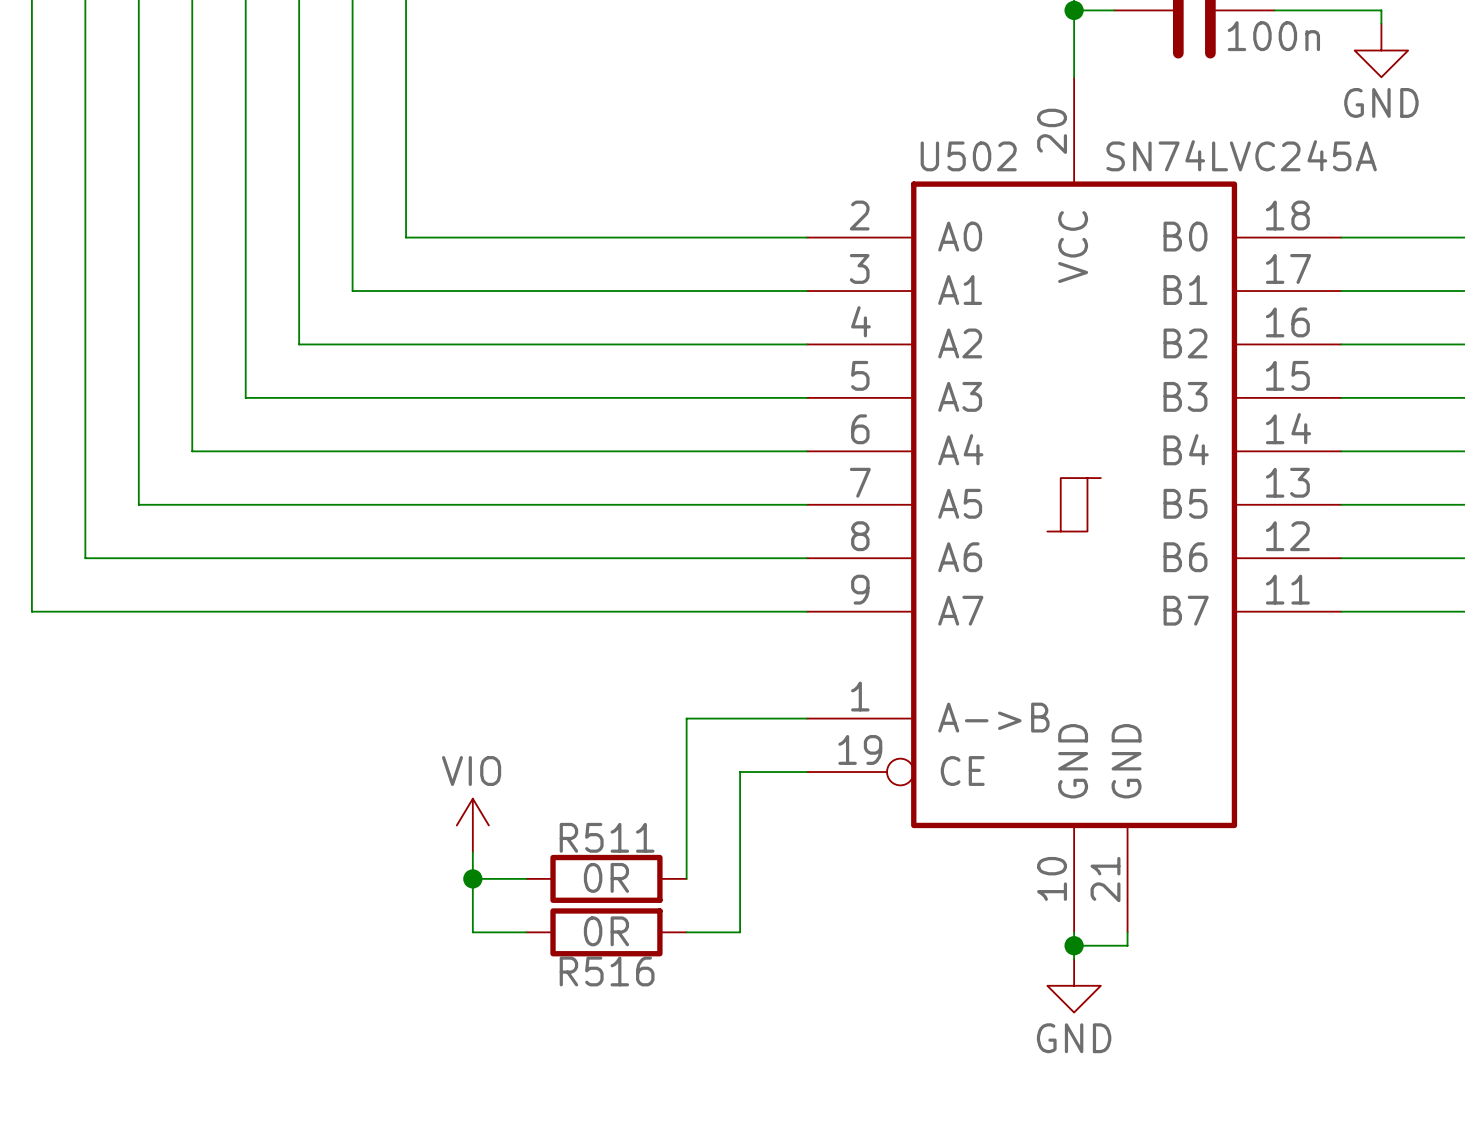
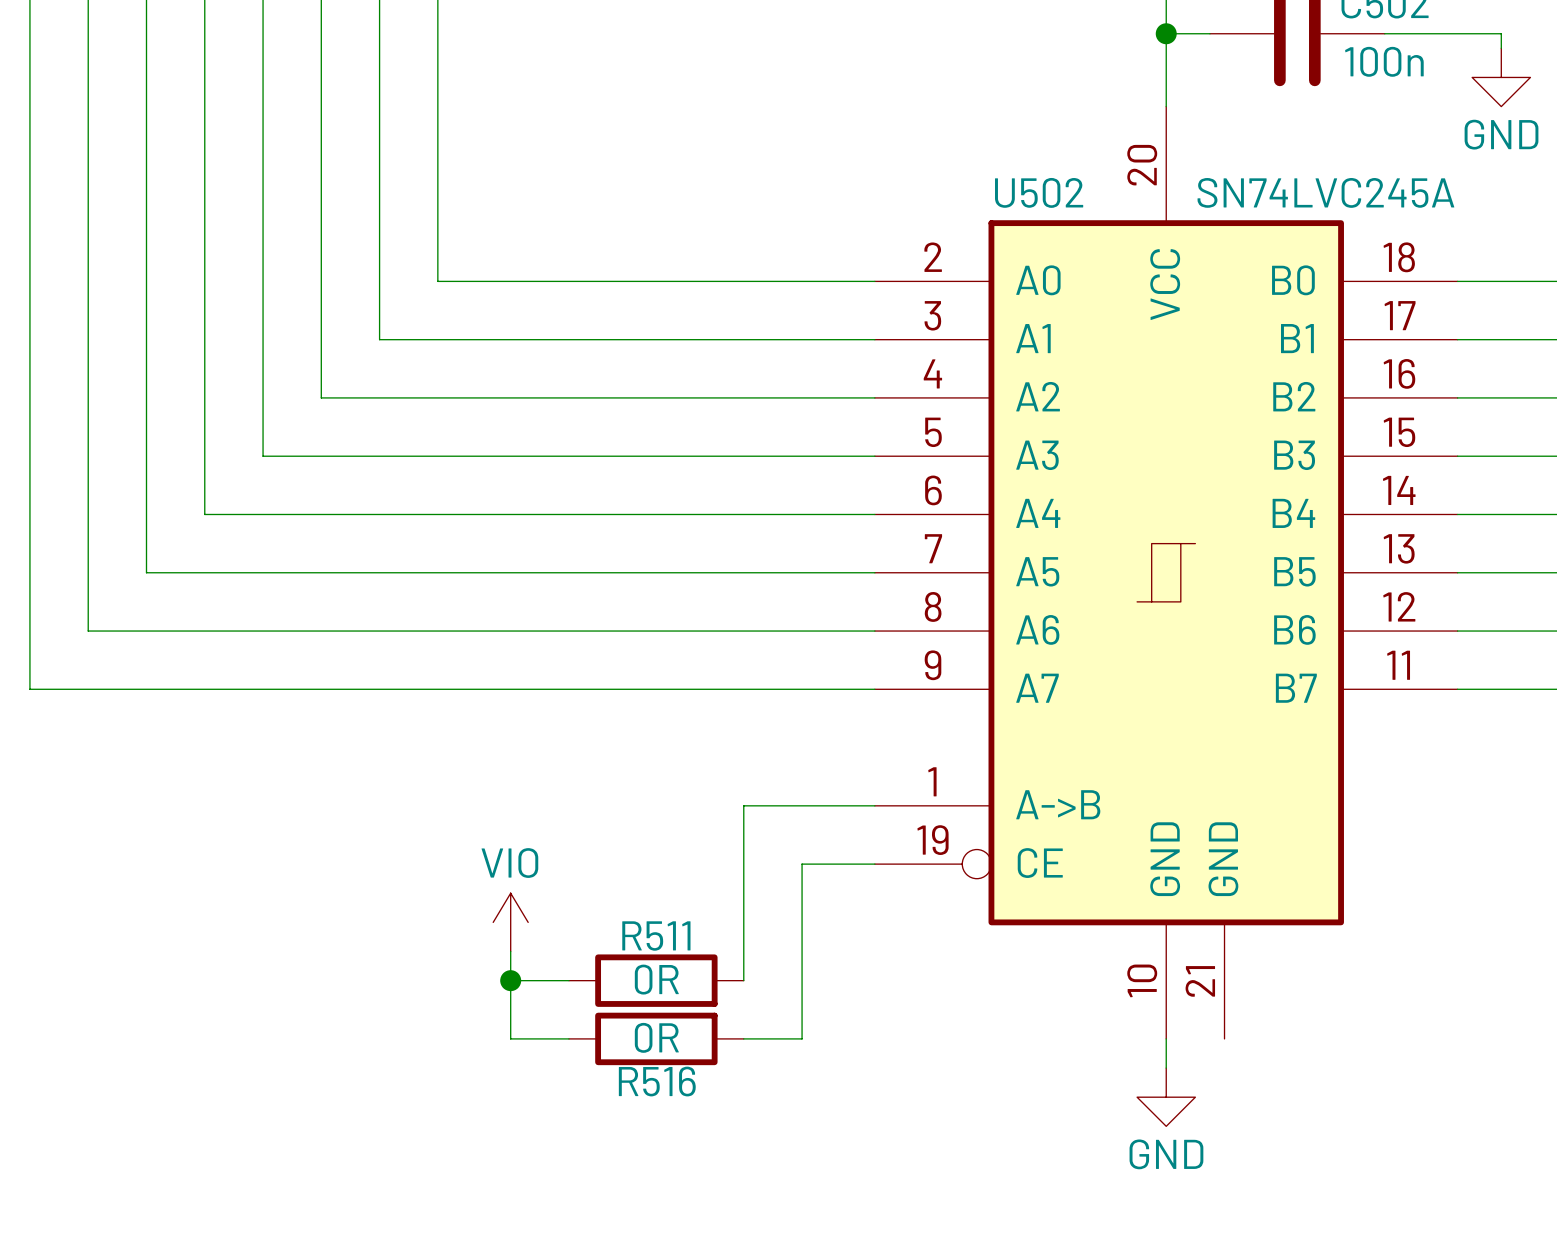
wire: (1127, 932) (1127, 945) (1074, 945) -> none
junction: (1074, 945) -> none

